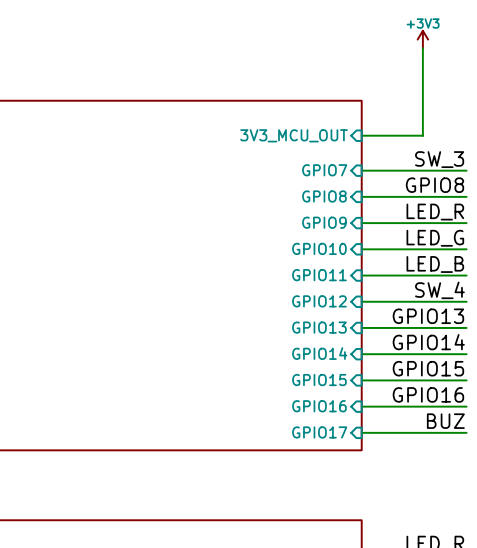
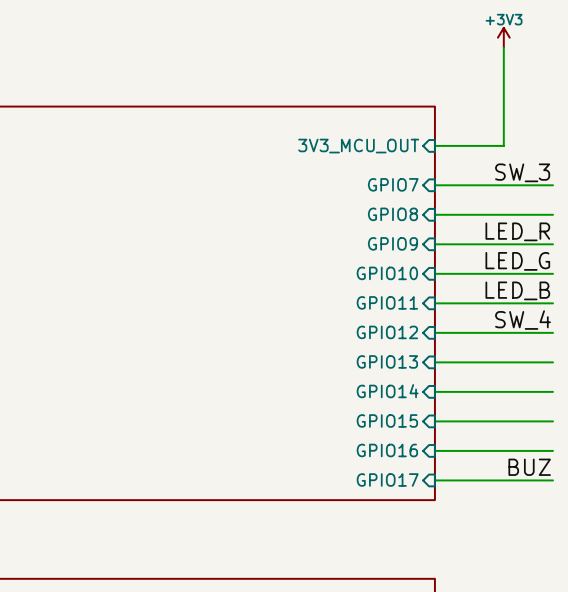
label: GPIO8 (434, 185) -> none
label: GPIO13 (428, 316) -> none
label: GPIO14 (428, 342) -> none
label: GPIO15 (428, 368) -> none
label: GPIO16 (428, 394) -> none

